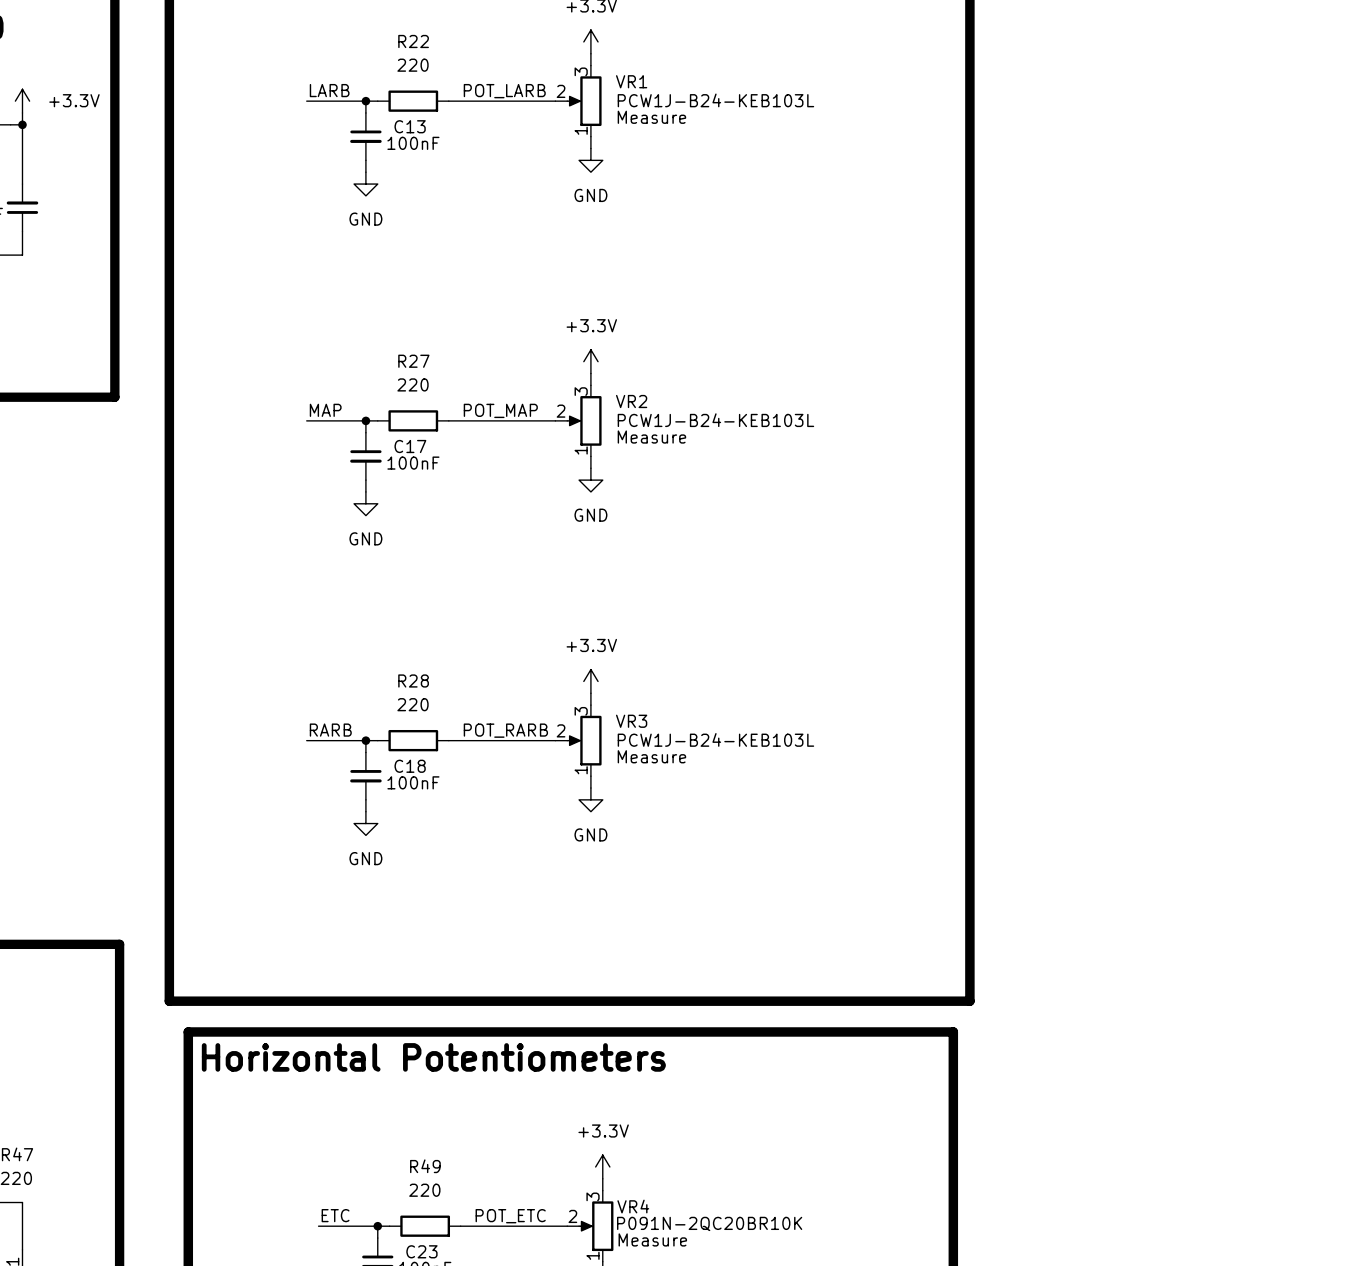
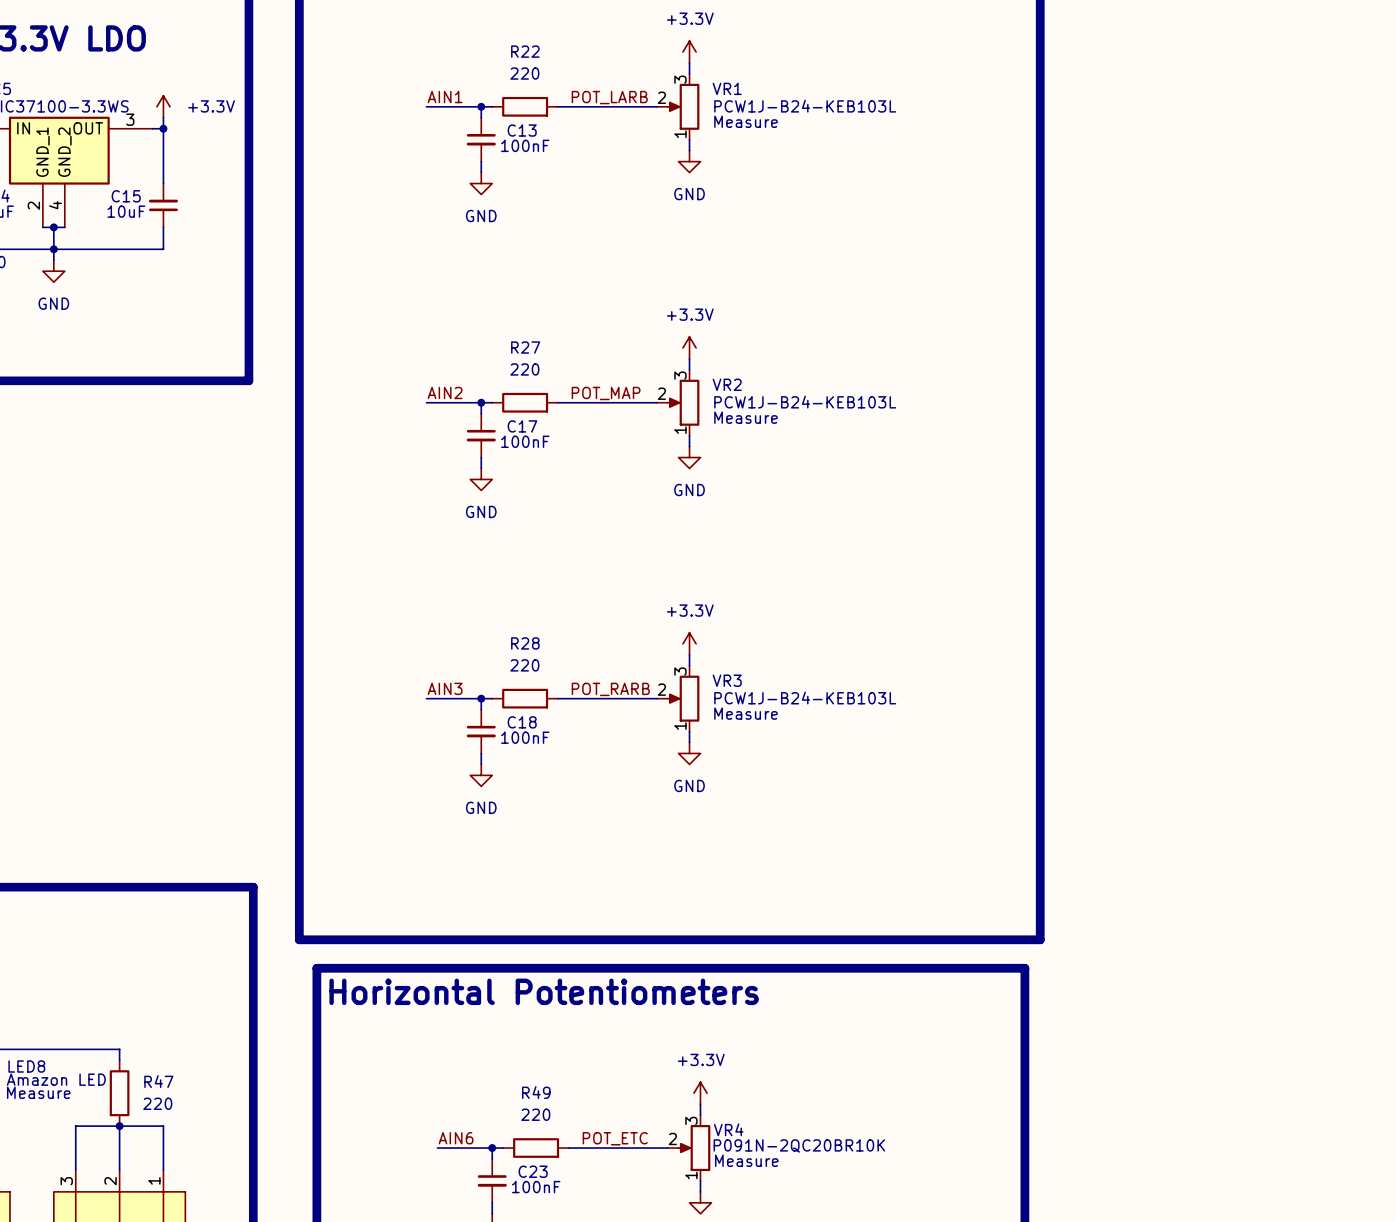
label: LARB (329, 90) -> AIN1 (445, 97)
label: MAP (325, 410) -> AIN2 (445, 392)
label: RARB (330, 730) -> AIN3 (445, 688)
label: ETC (335, 1215) -> AIN6 (456, 1138)

